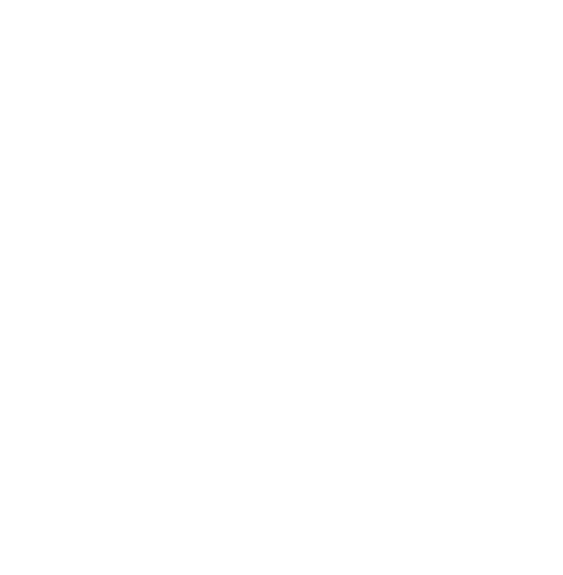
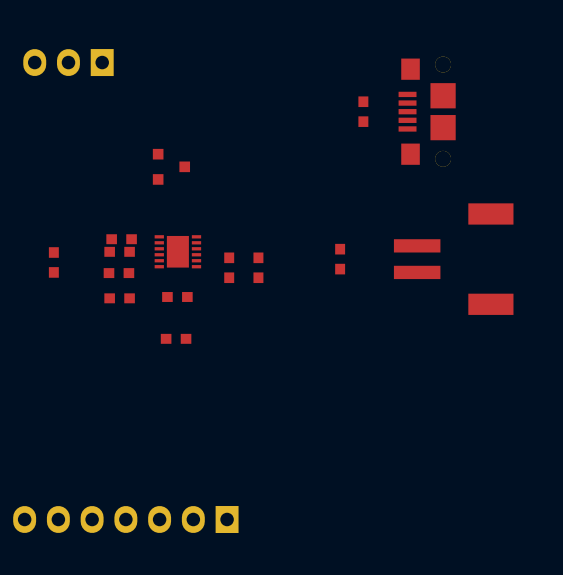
part: none -> (68, 62)
part: none -> (363, 111)
part: none -> (427, 111)
part: none -> (171, 166)
part: none -> (121, 239)
part: none -> (119, 251)
part: none -> (177, 251)
part: none -> (340, 259)
part: none -> (453, 259)
part: none -> (53, 262)
part: none -> (229, 267)
part: none -> (258, 267)
part: none -> (118, 273)
part: none -> (177, 297)
part: none -> (119, 298)
part: none -> (176, 338)
part: none -> (125, 519)

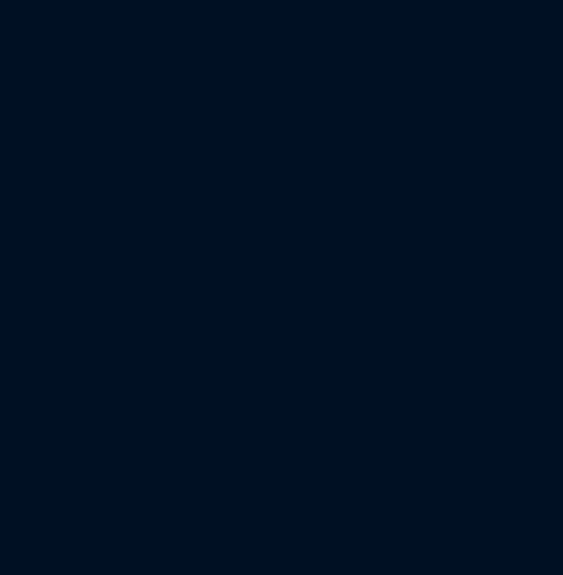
part: (68, 62) -> none
part: (363, 111) -> none
part: (427, 111) -> none
part: (171, 166) -> none
part: (121, 239) -> none
part: (119, 251) -> none
part: (177, 251) -> none
part: (340, 259) -> none
part: (453, 259) -> none
part: (53, 262) -> none
part: (229, 267) -> none
part: (258, 267) -> none
part: (118, 273) -> none
part: (177, 297) -> none
part: (119, 298) -> none
part: (176, 338) -> none
part: (125, 519) -> none

